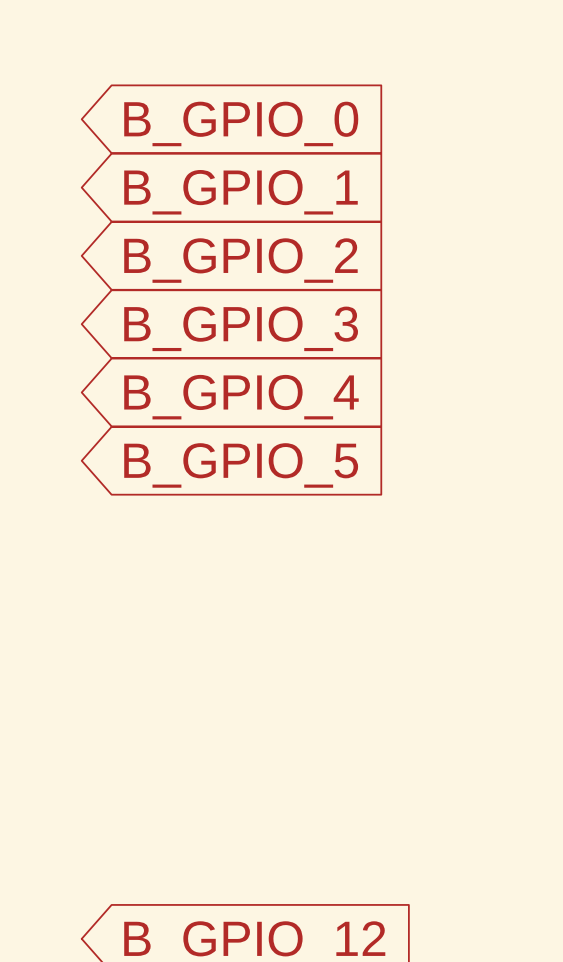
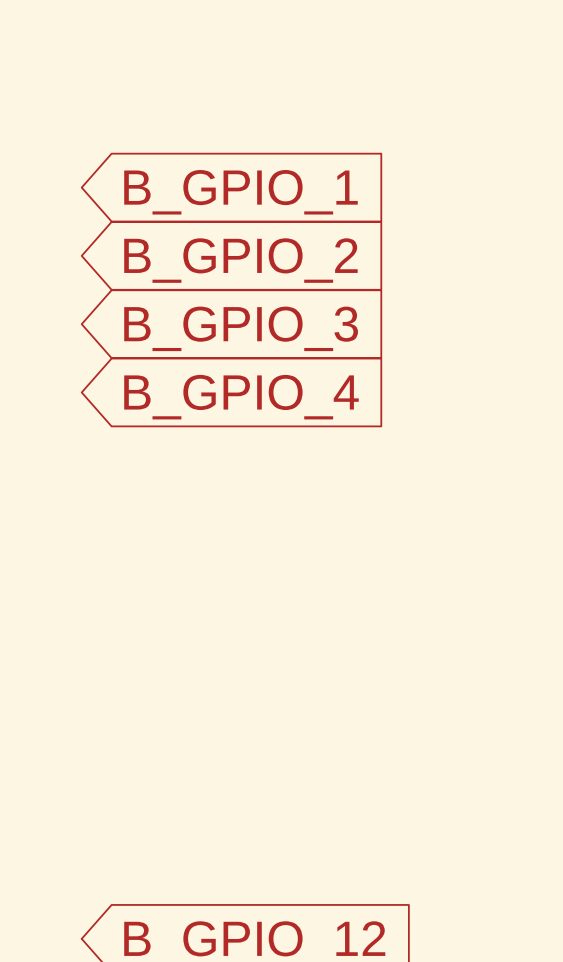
global label: B_GPIO_0 (241, 123) -> none
global label: B_GPIO_5 (241, 465) -> none

